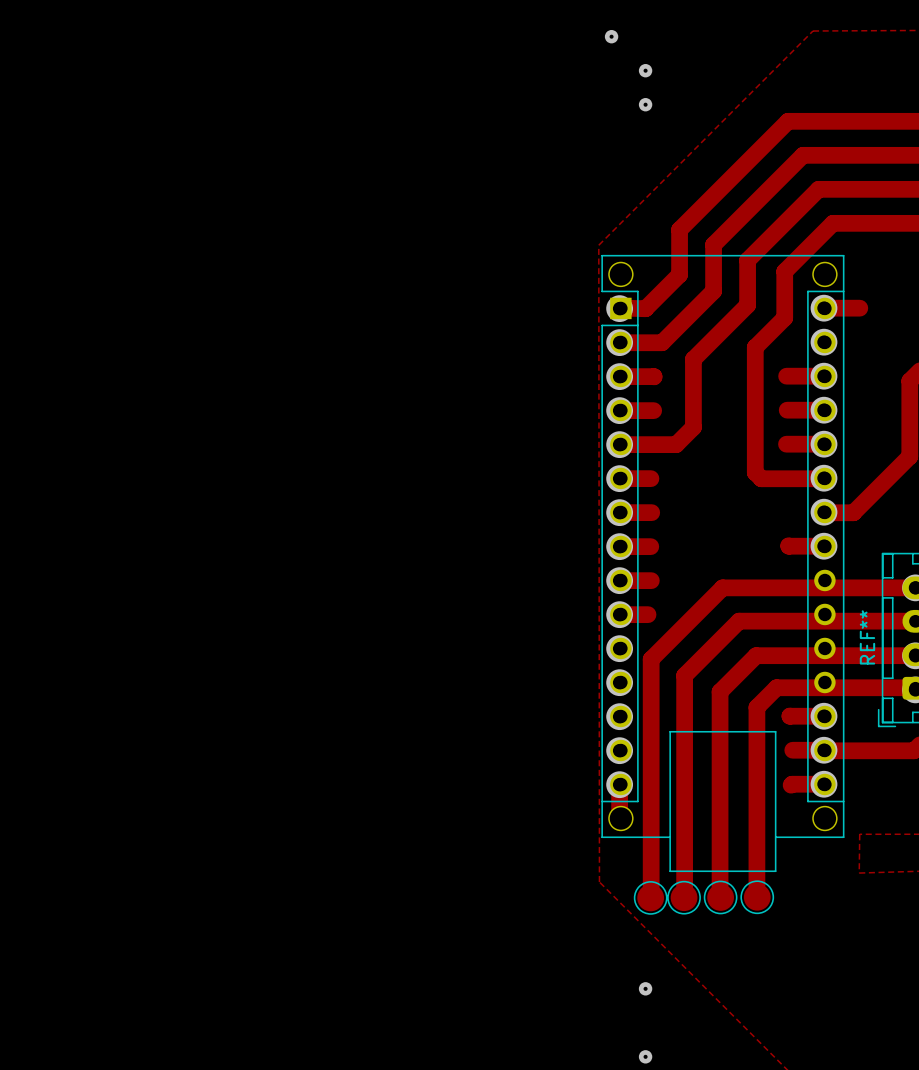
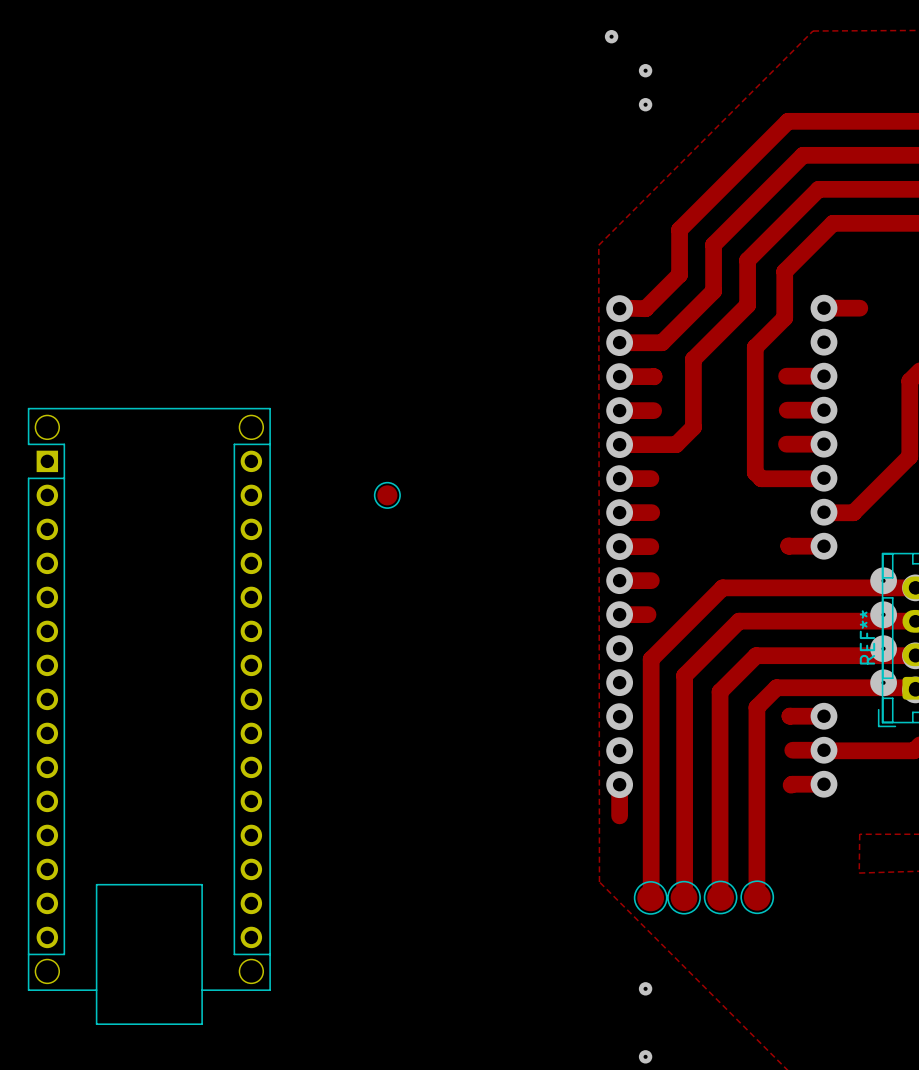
part: none -> (387, 495)
part: (722, 563) -> none
via: none -> (883, 580)
via: none -> (883, 614)
via: none -> (883, 648)
via: none -> (883, 682)
part: none -> (149, 716)

